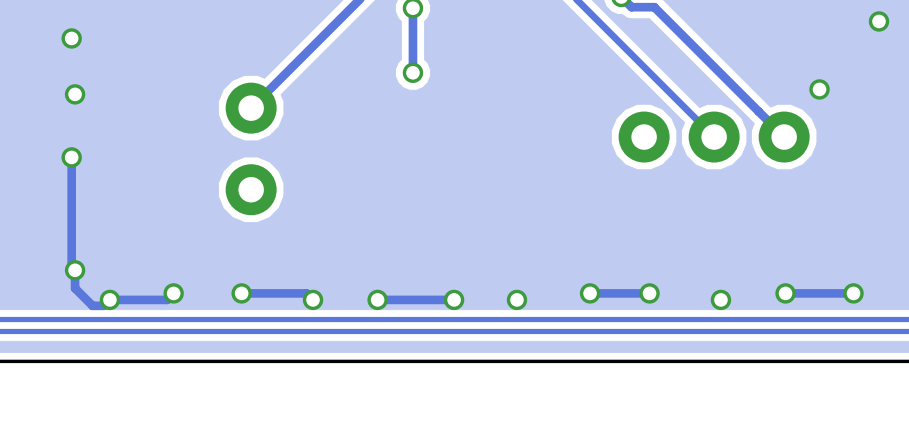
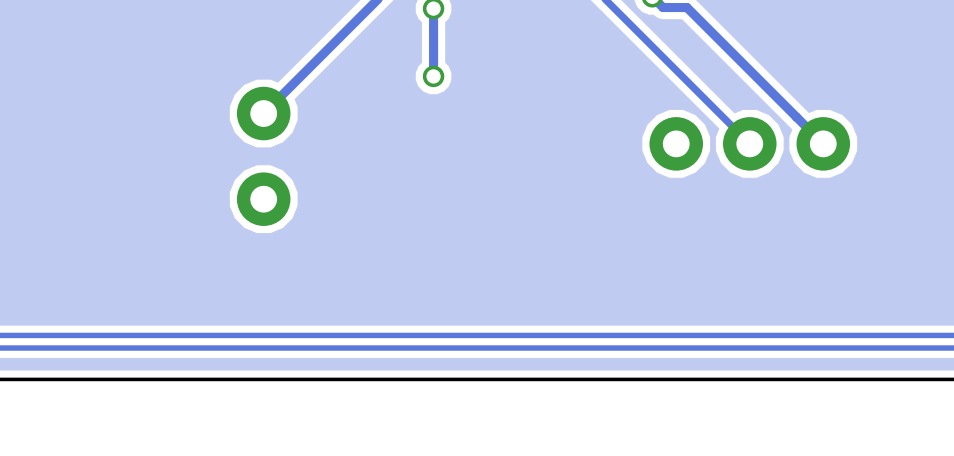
via: (879, 21) -> none
via: (71, 38) -> none
via: (819, 89) -> none
via: (75, 94) -> none
track: (71, 157) (71, 266) (75, 270) (75, 288) (92, 305) (104, 305) (109, 299) (167, 299) (173, 293) -> none
via: (71, 157) -> none
via: (75, 270) -> none
via: (173, 293) -> none
track: (241, 293) (306, 293) (313, 299) -> none
via: (241, 293) -> none
via: (590, 293) -> none
track: (649, 293) (590, 293) -> none
via: (649, 293) -> none
via: (785, 293) -> none
track: (853, 293) (785, 293) -> none
via: (853, 293) -> none
via: (109, 299) -> none
via: (313, 299) -> none
via: (377, 299) -> none
track: (454, 299) (377, 299) -> none
via: (454, 299) -> none
via: (516, 299) -> none
via: (720, 299) -> none

